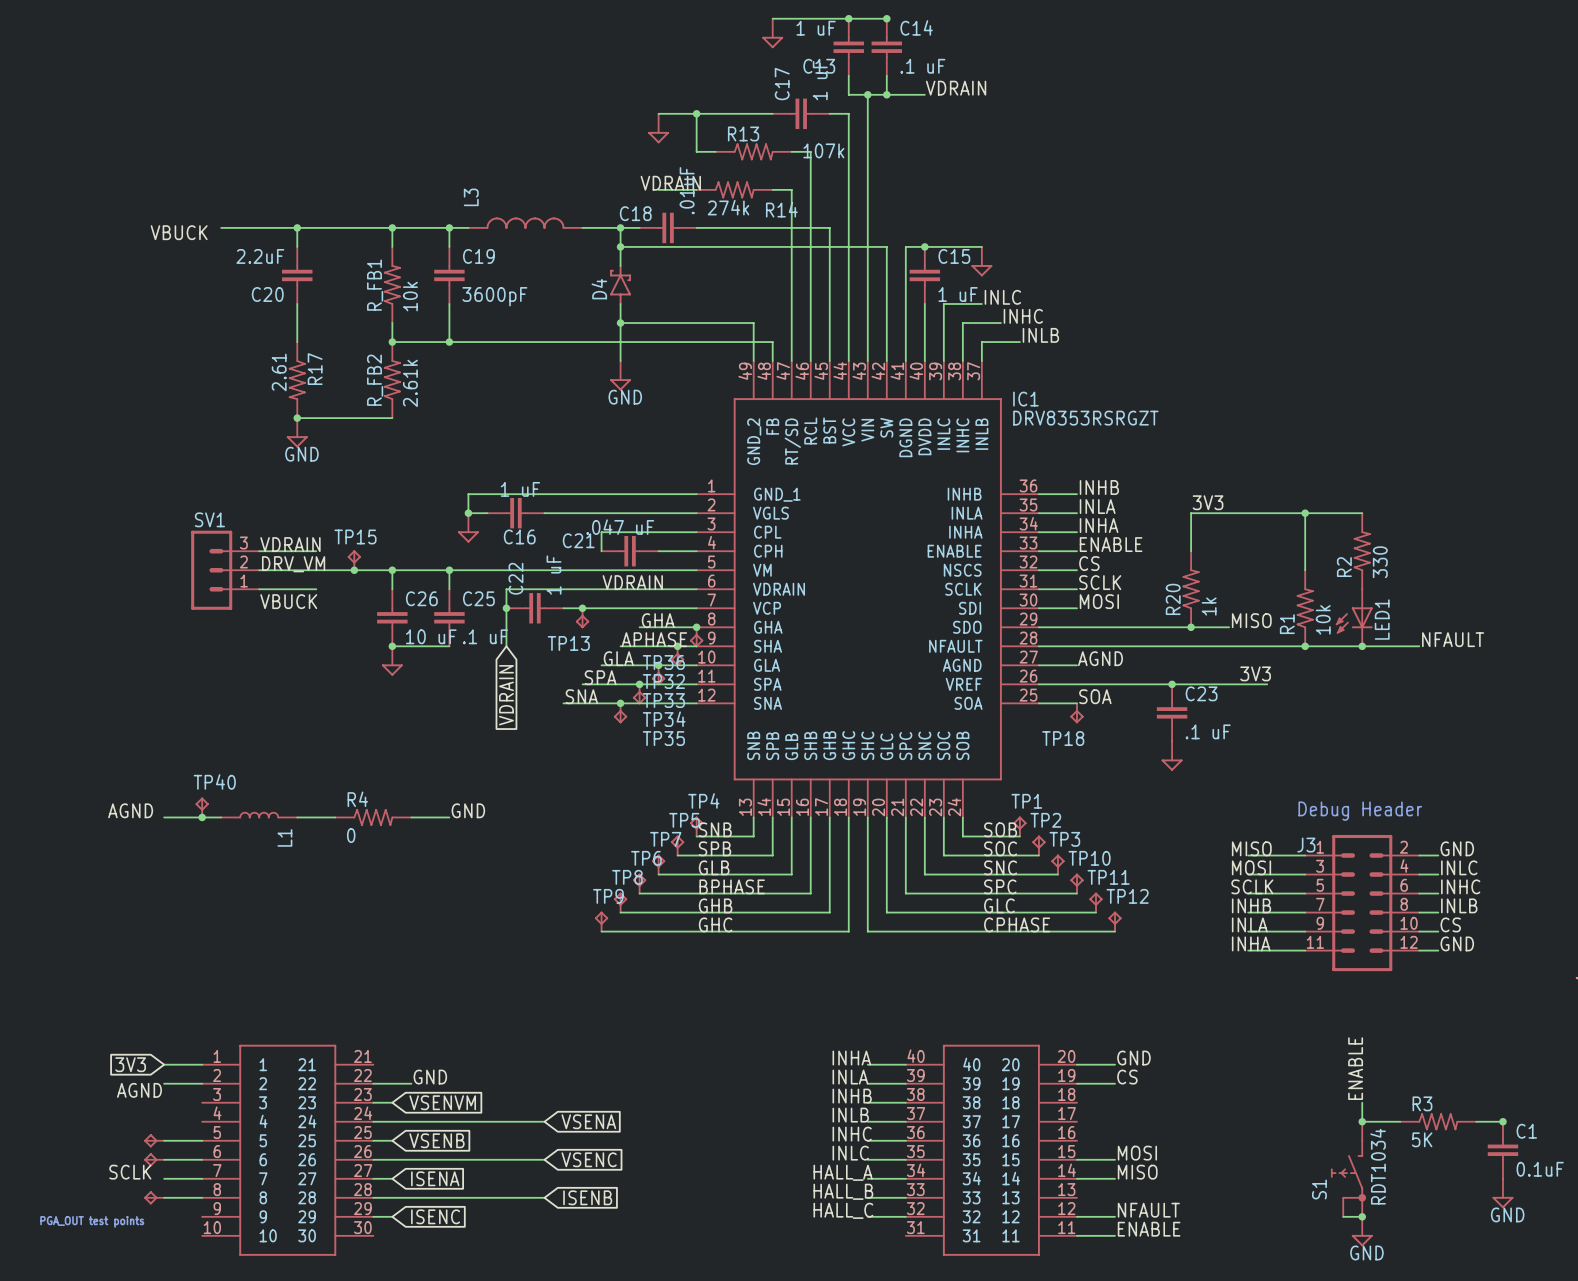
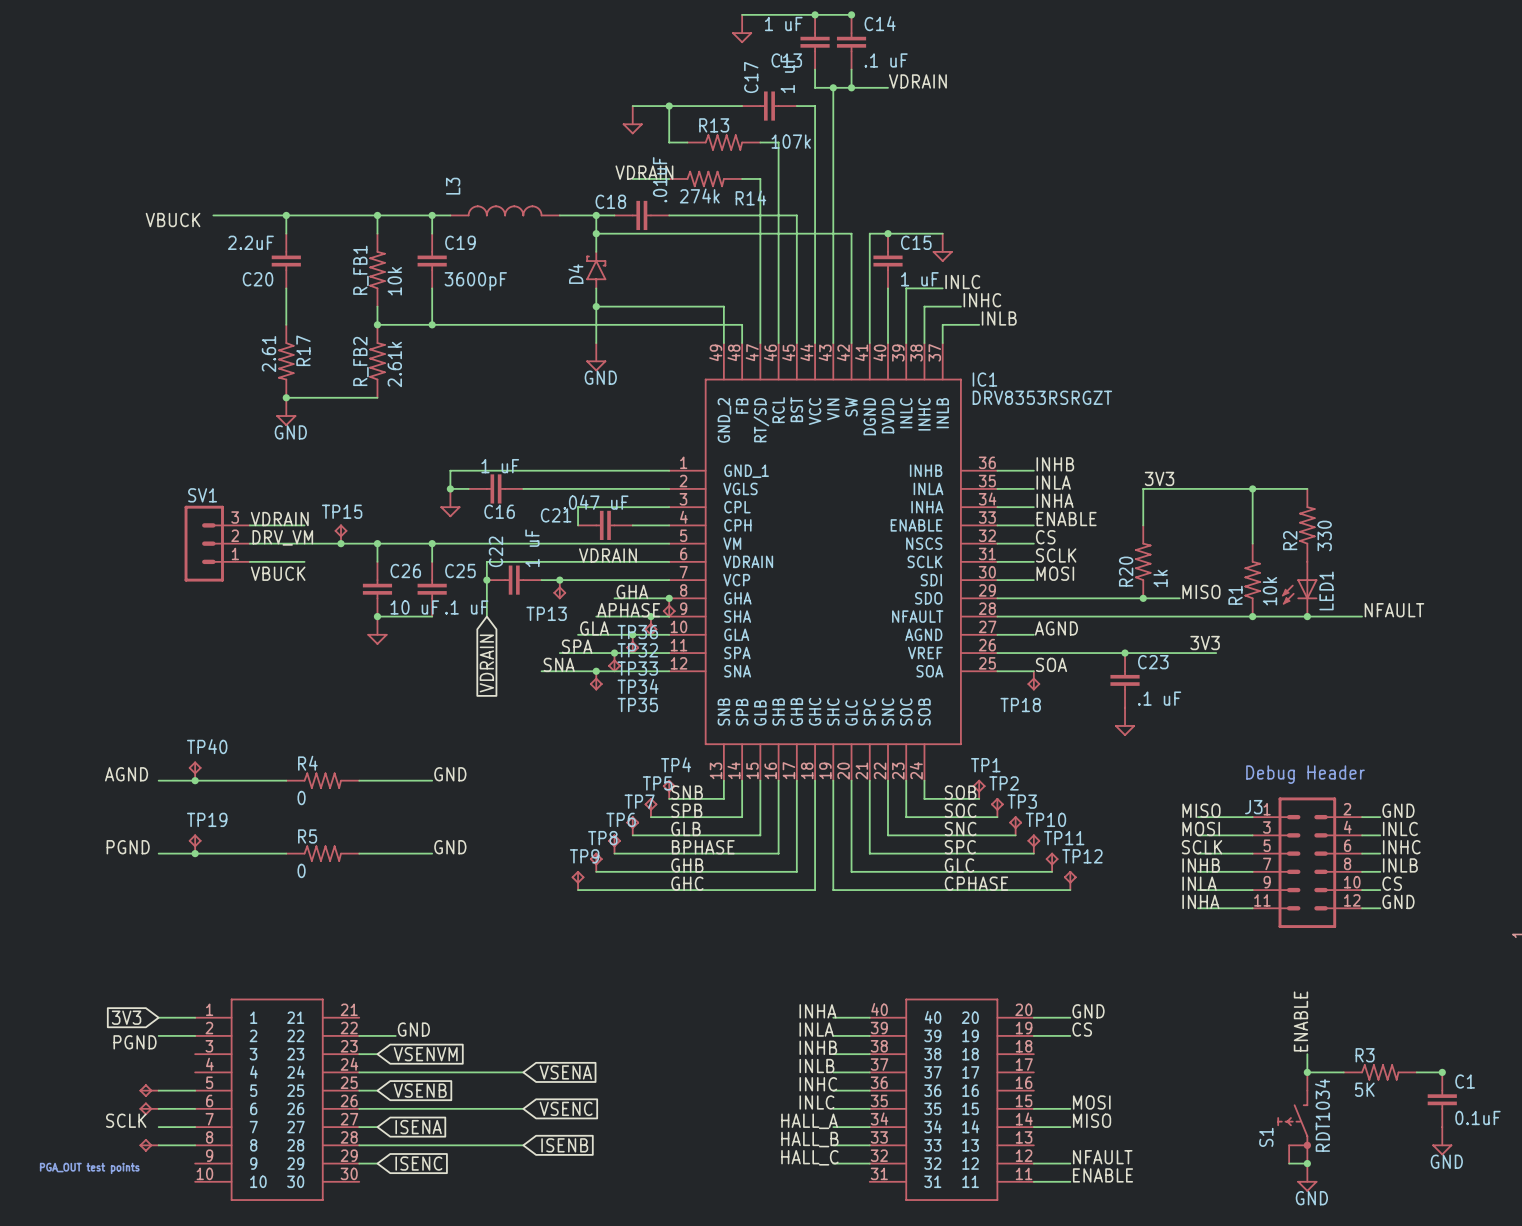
L1: (259, 815) -> none
R4 position: (373, 817) -> (322, 780)
TP19: none -> (195, 844)
label: none -> PGND (128, 847)
label: none -> GND (450, 847)
wire: none -> (158, 853) (286, 853)
junction: none -> (195, 853)
R5: none -> 0 (322, 853)
wire: none -> (359, 853) (432, 853)
label: AGND (139, 1090) -> PGND (135, 1042)

